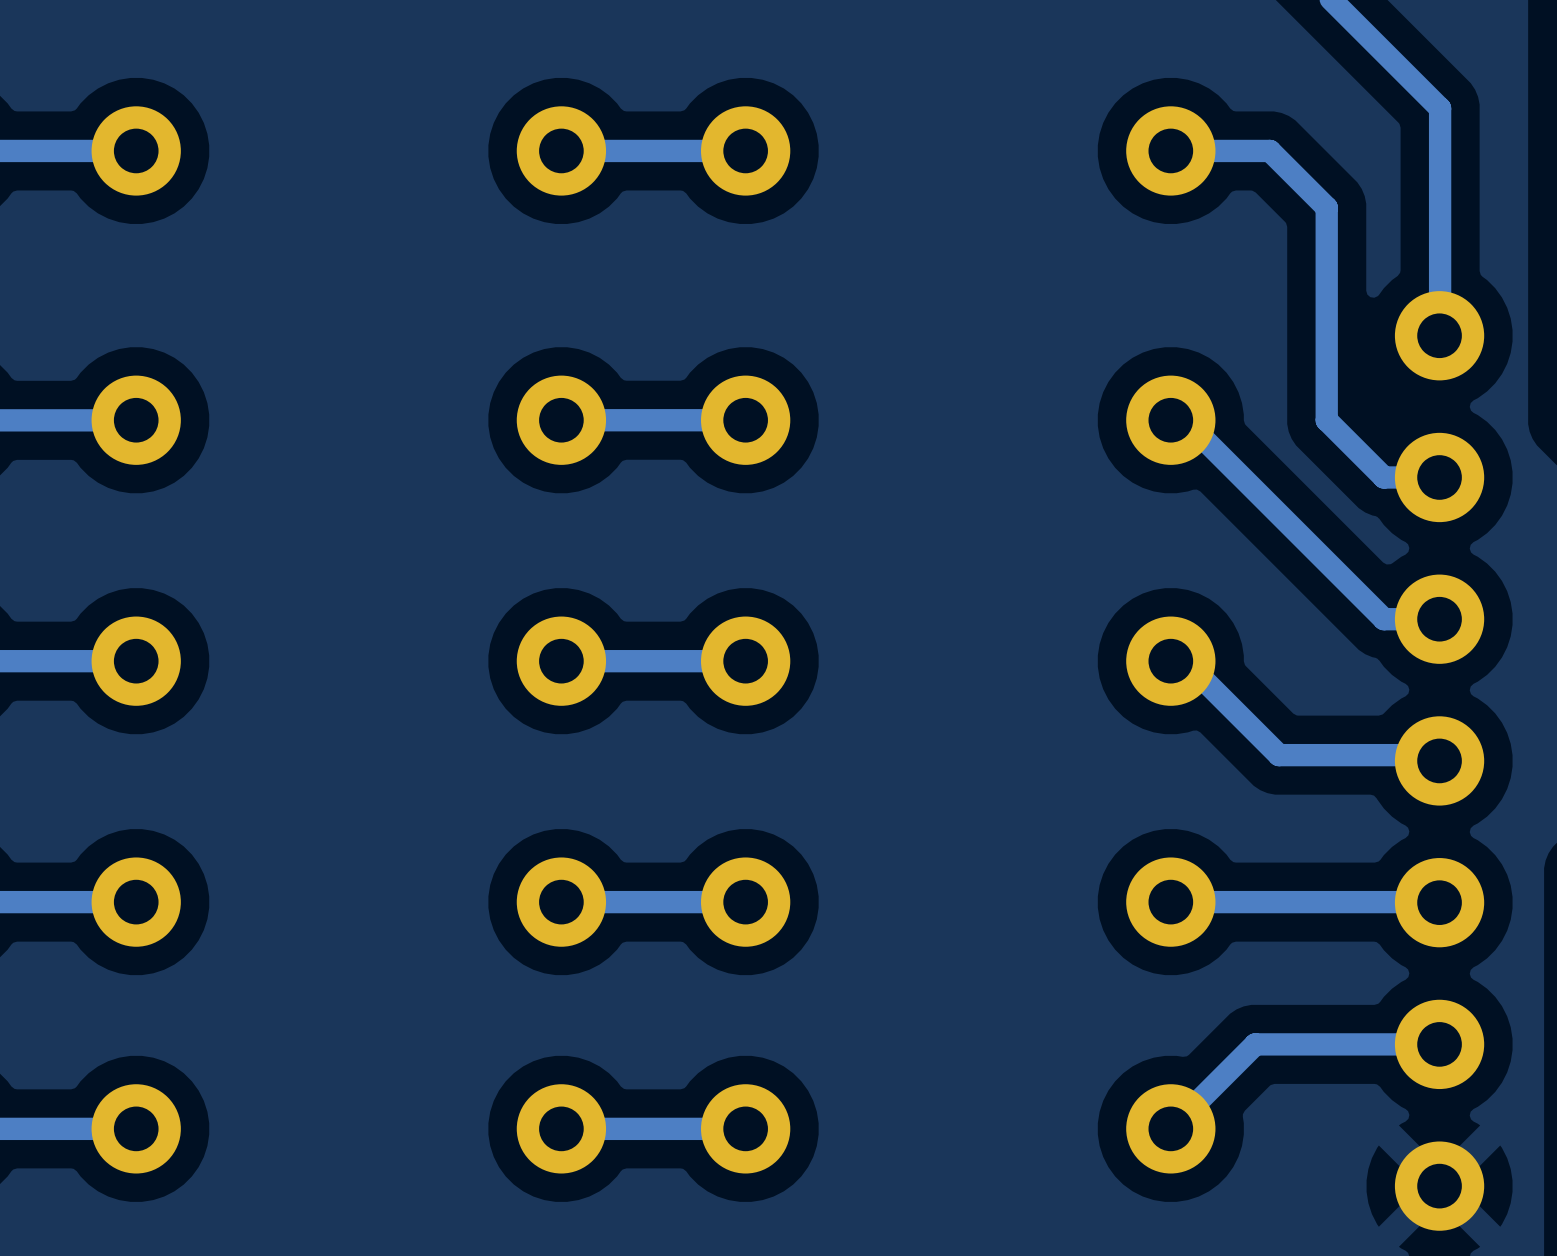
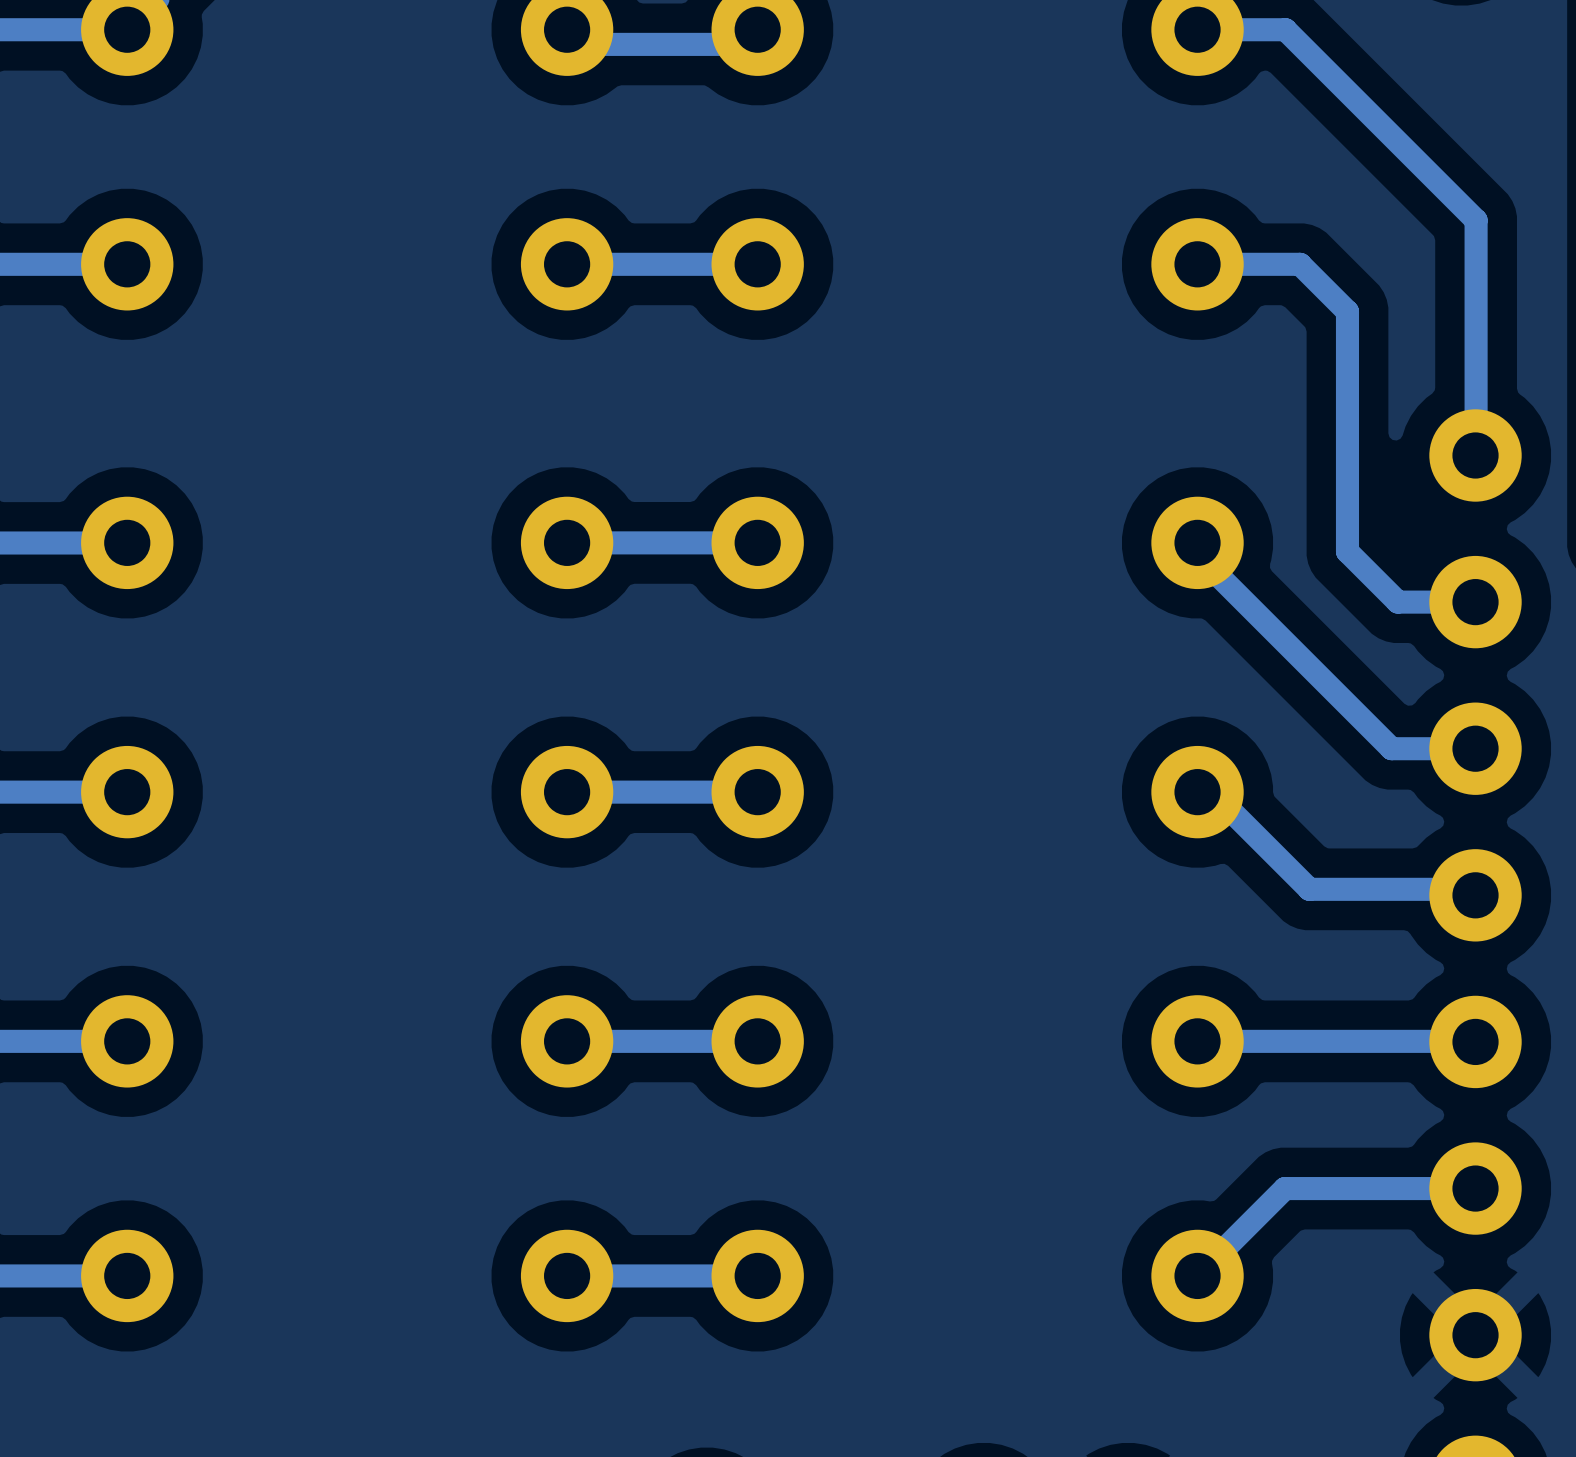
track: (1315, 196) (1326, 207) (1326, 420) (1383, 477) -> (1347, 311) (1347, 551) (1397, 602) (1418, 602)
track: (1185, 420) (1383, 619) -> (1212, 542) (1212, 569) (1391, 748) (1418, 748)

